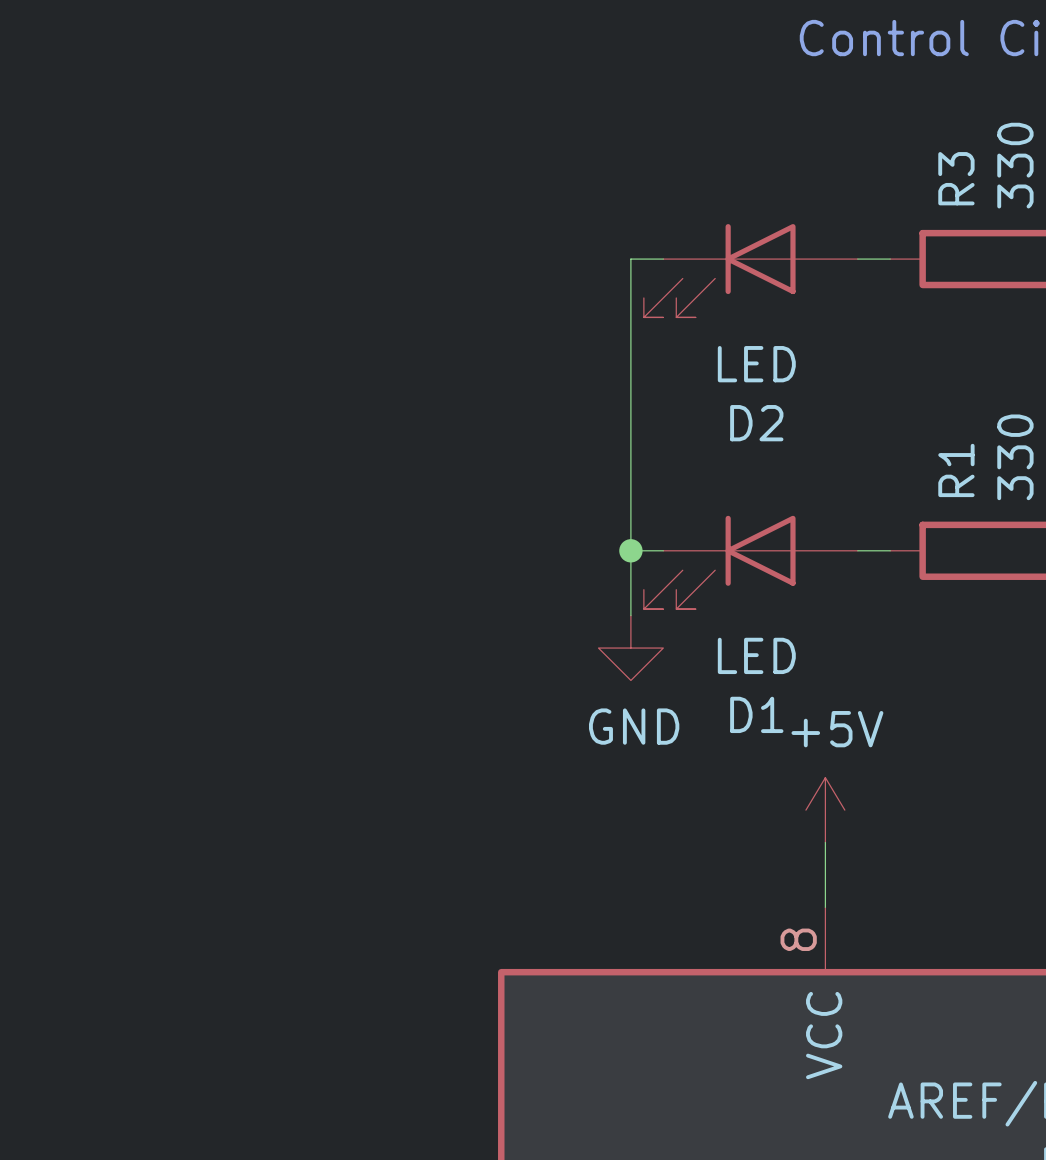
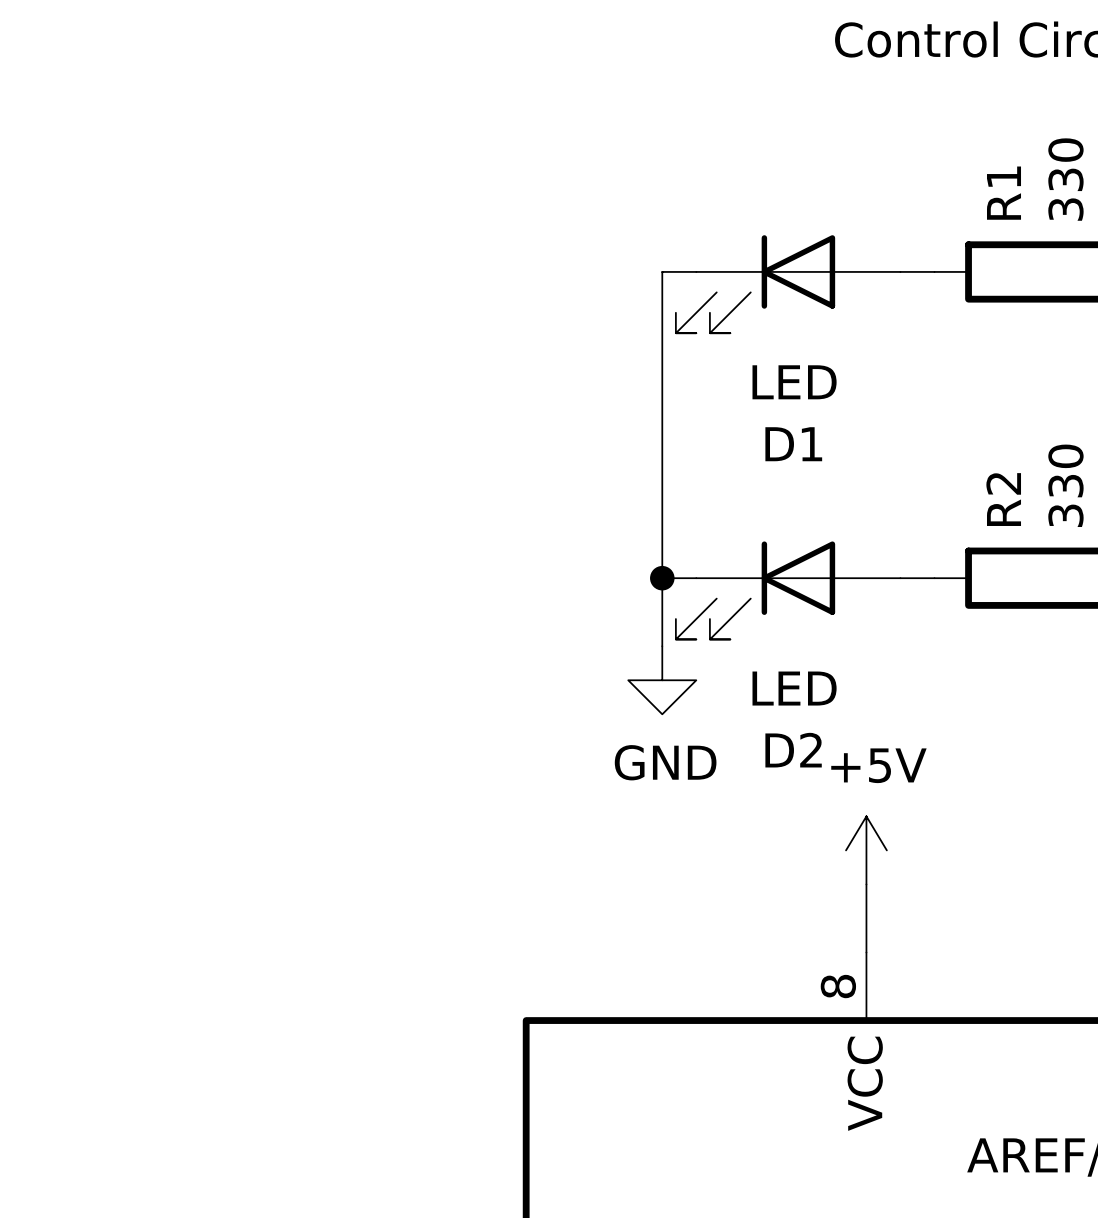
R3 name: R3 (956, 178) -> R1 (1004, 193)
D2 name: D2 (756, 423) -> D1 (793, 444)
R1 name: R1 (956, 470) -> R2 (1003, 499)
D1 name: D1 (756, 714) -> D2 (793, 750)

